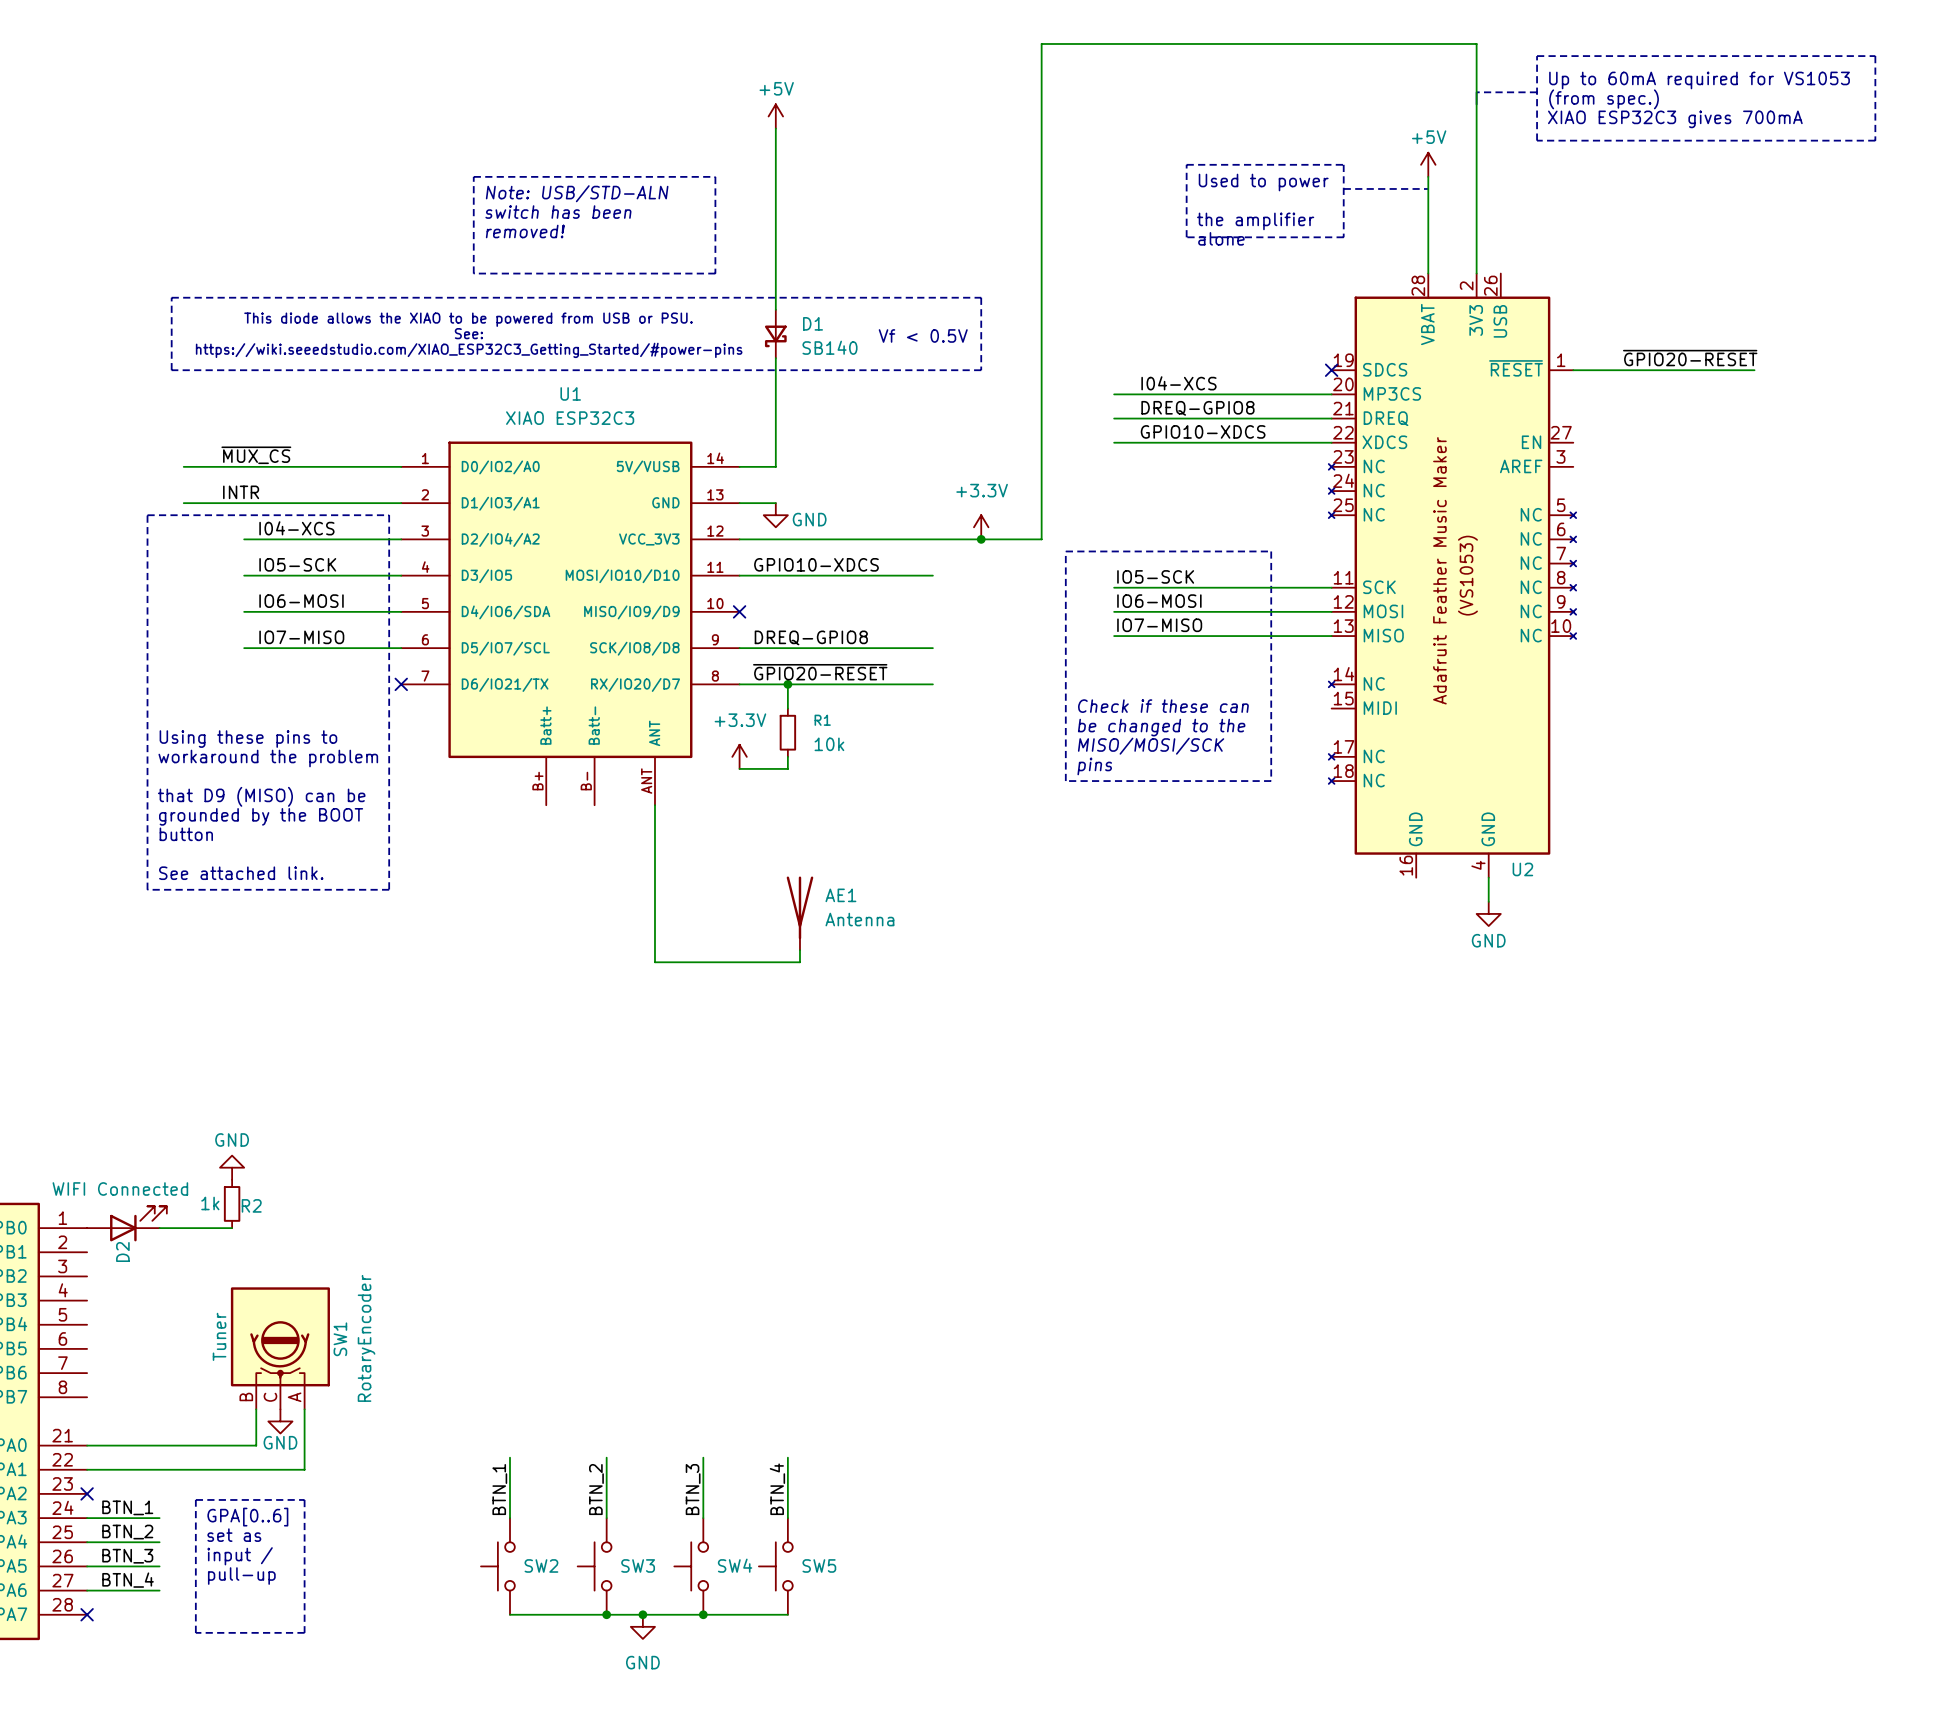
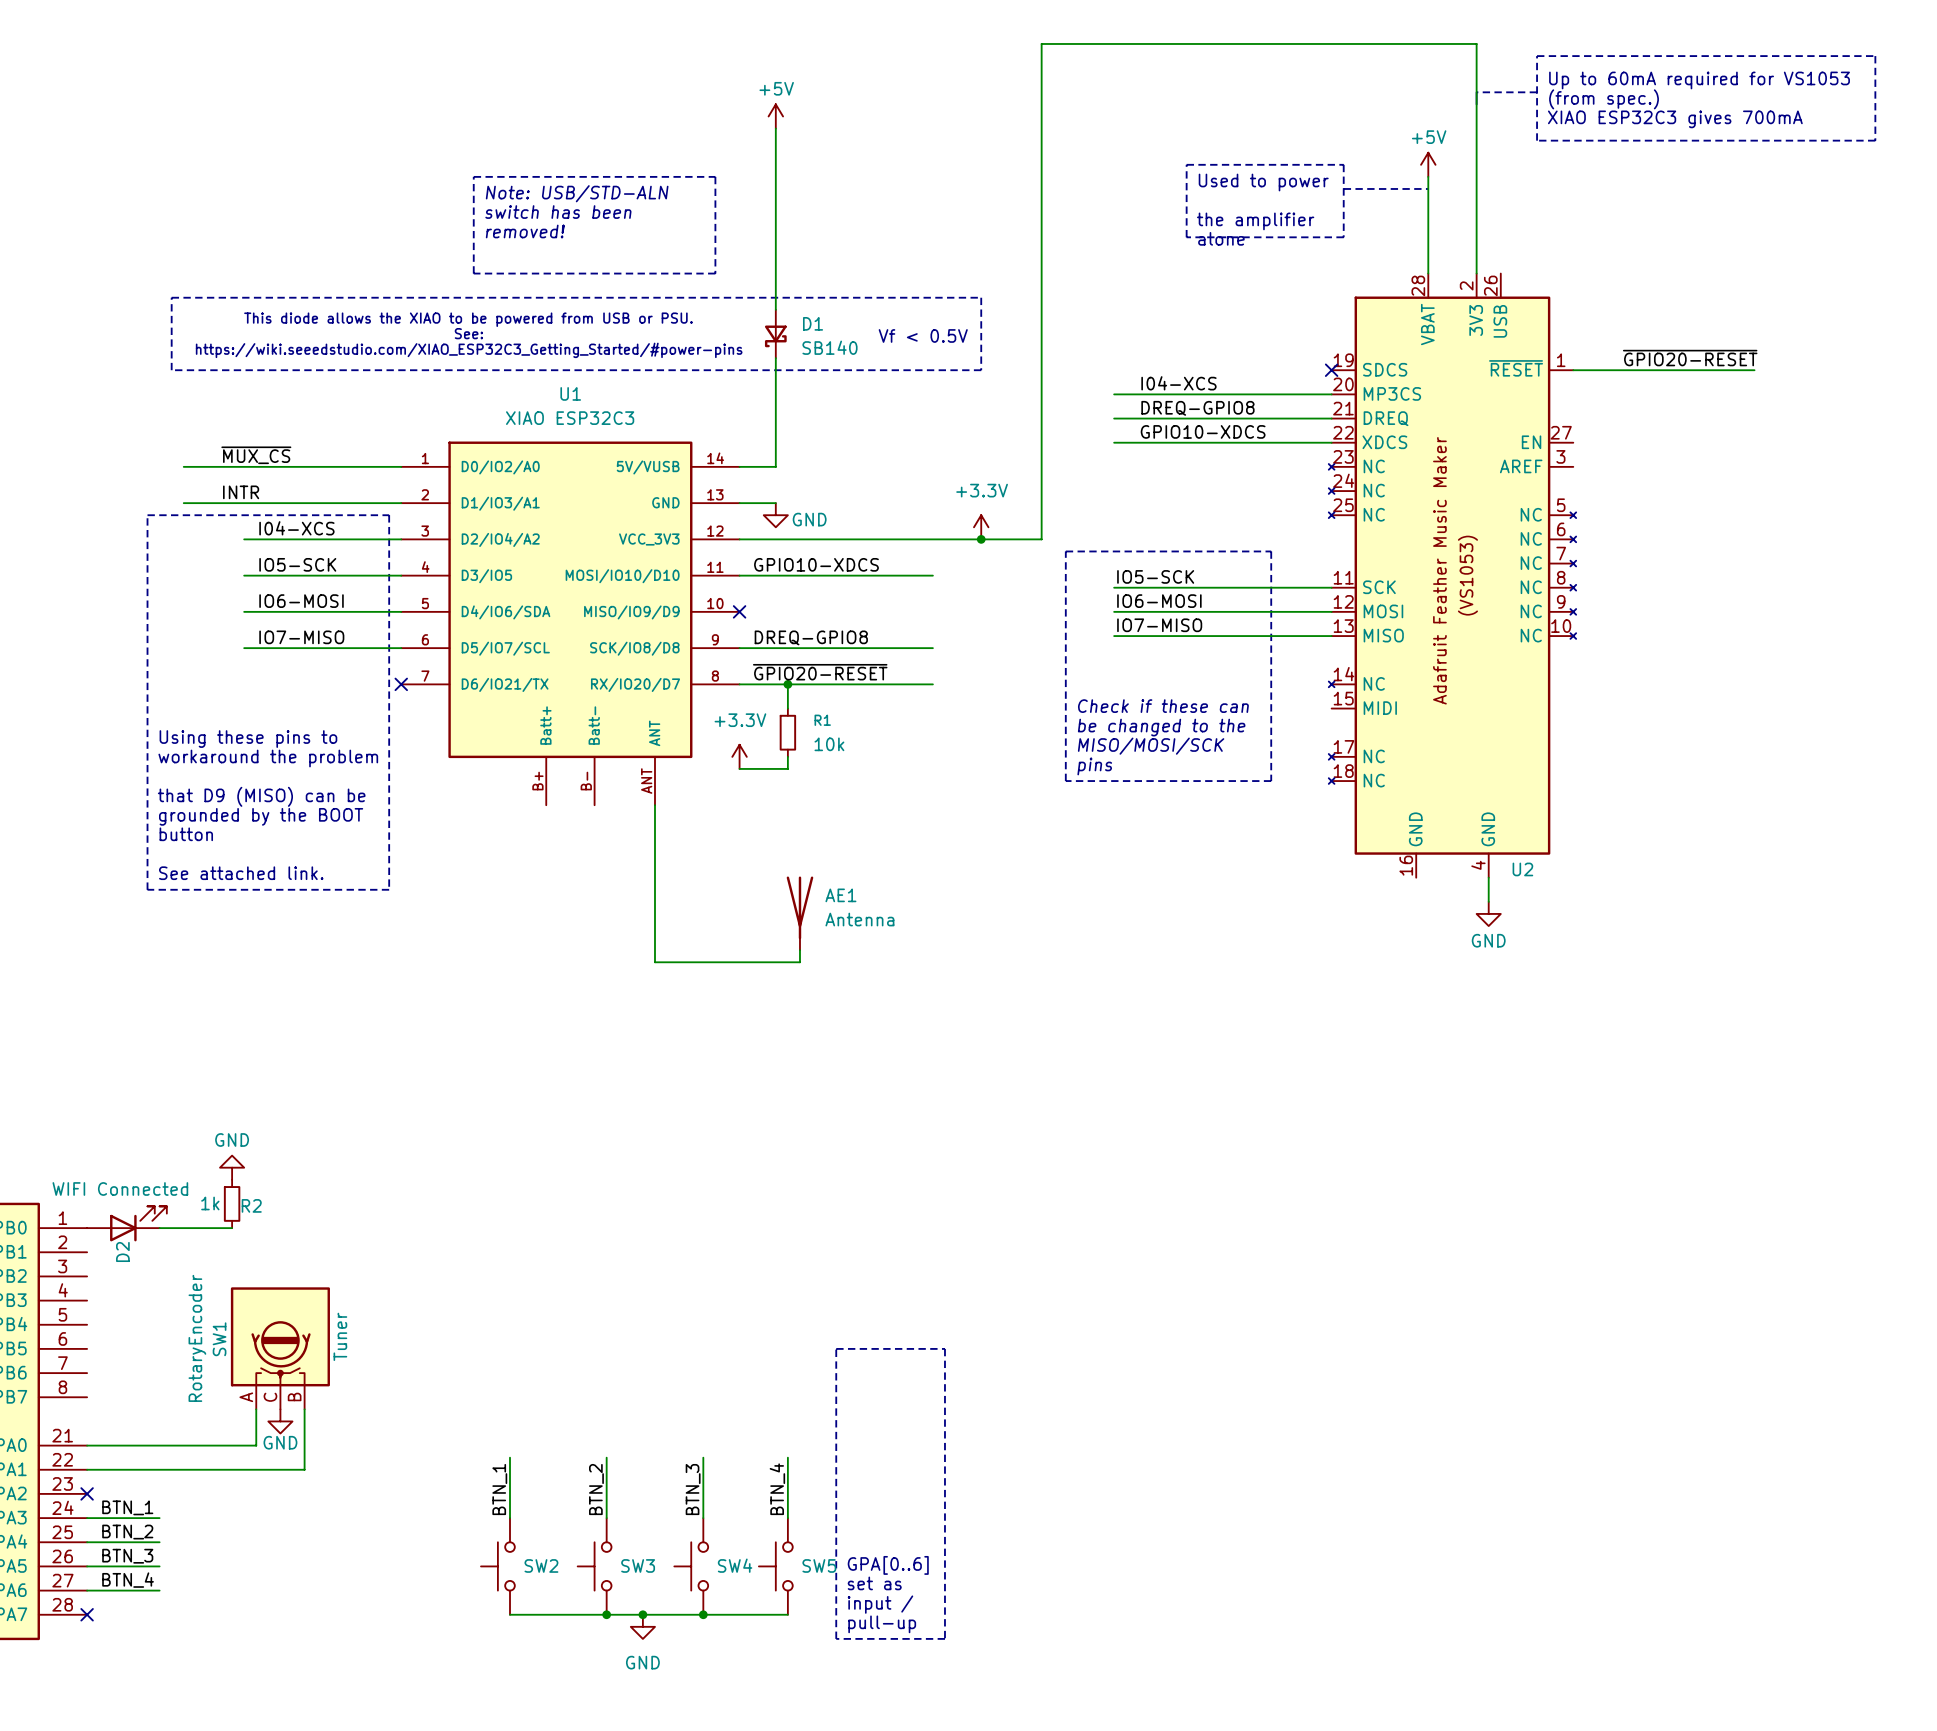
SW1 flip: as is (280, 1336) -> left-right (280, 1336)
line: none -> (836, 1348) (944, 1348) (944, 1638) (836, 1638) (836, 1348)
line: (195, 1499) (304, 1499) (304, 1632) (195, 1632) (195, 1499) -> none
text: GPA[0..6] (247, 1517) -> none
text: set as (234, 1535) -> none
text: input / (240, 1556) -> none
text: none -> GPA[0..6] (888, 1565)
text: pull-up (241, 1576) -> none
text: none -> set as (874, 1583)
text: none -> input / (880, 1604)
text: none -> pull-up (882, 1624)

